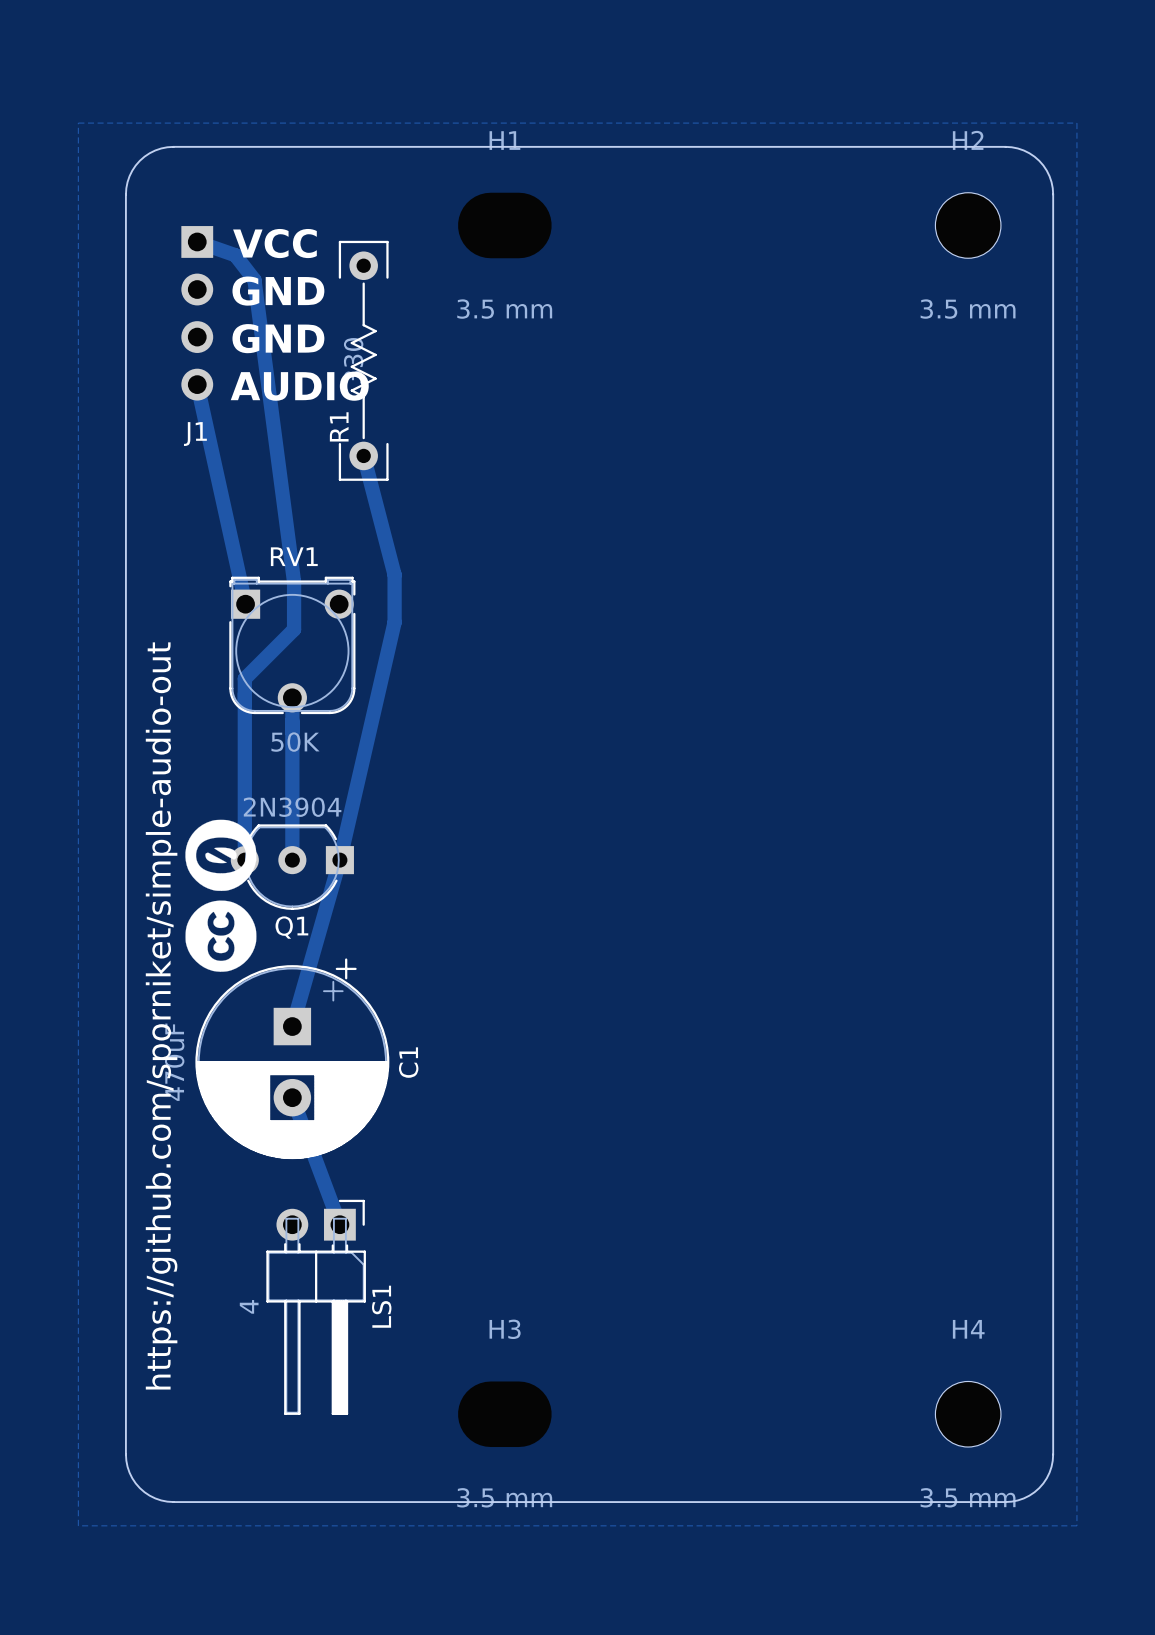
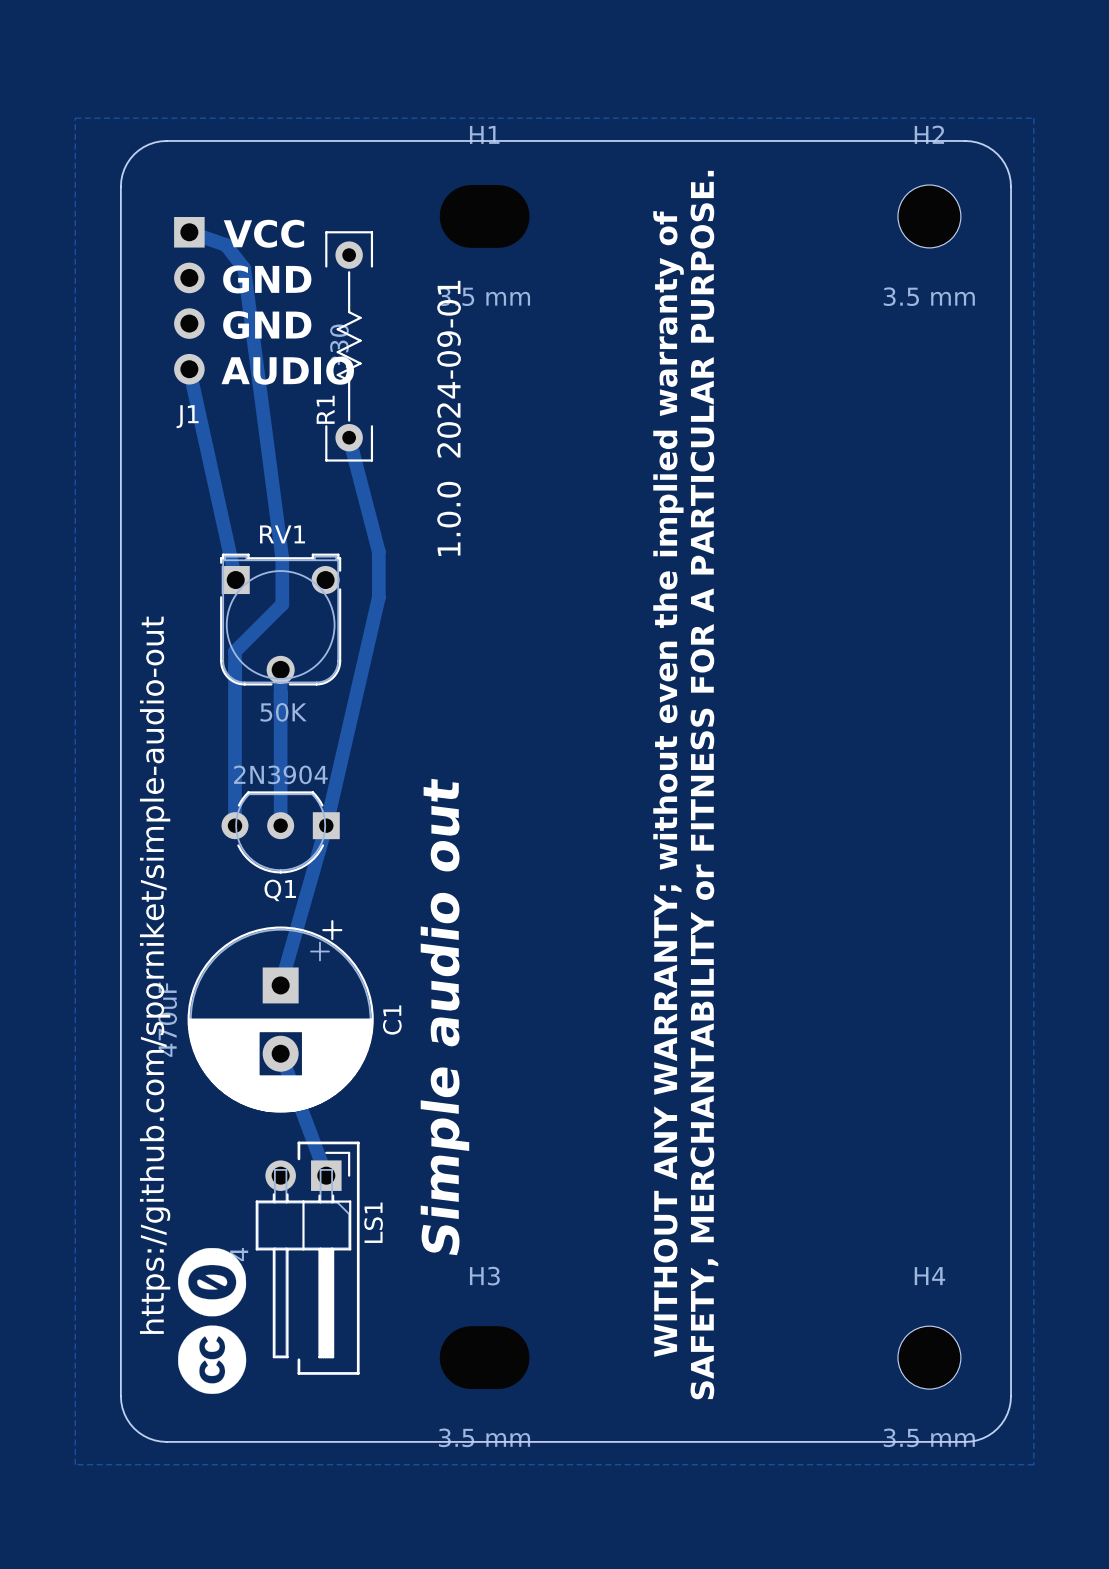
text: none -> 1.0.0 2024-09-01 (449, 418)
text: none -> WITHOUT ANY WARRANTY; without even the implied warranty of (668, 784)
text: none -> SAFETY, MERCHANTABILITY or FITNESS FOR A PARTICULAR PURPOSE. (704, 785)
drawing: [185, 819, 257, 972] -> none
text: none -> Simple audio out (444, 1017)
line: none -> (298, 1158) (298, 1142) (358, 1142) (358, 1373) (298, 1373) (298, 1359)
drawing: none -> [177, 1248, 247, 1394]
LS1 name position: LS1 (381, 1306) -> LS1 (373, 1222)

